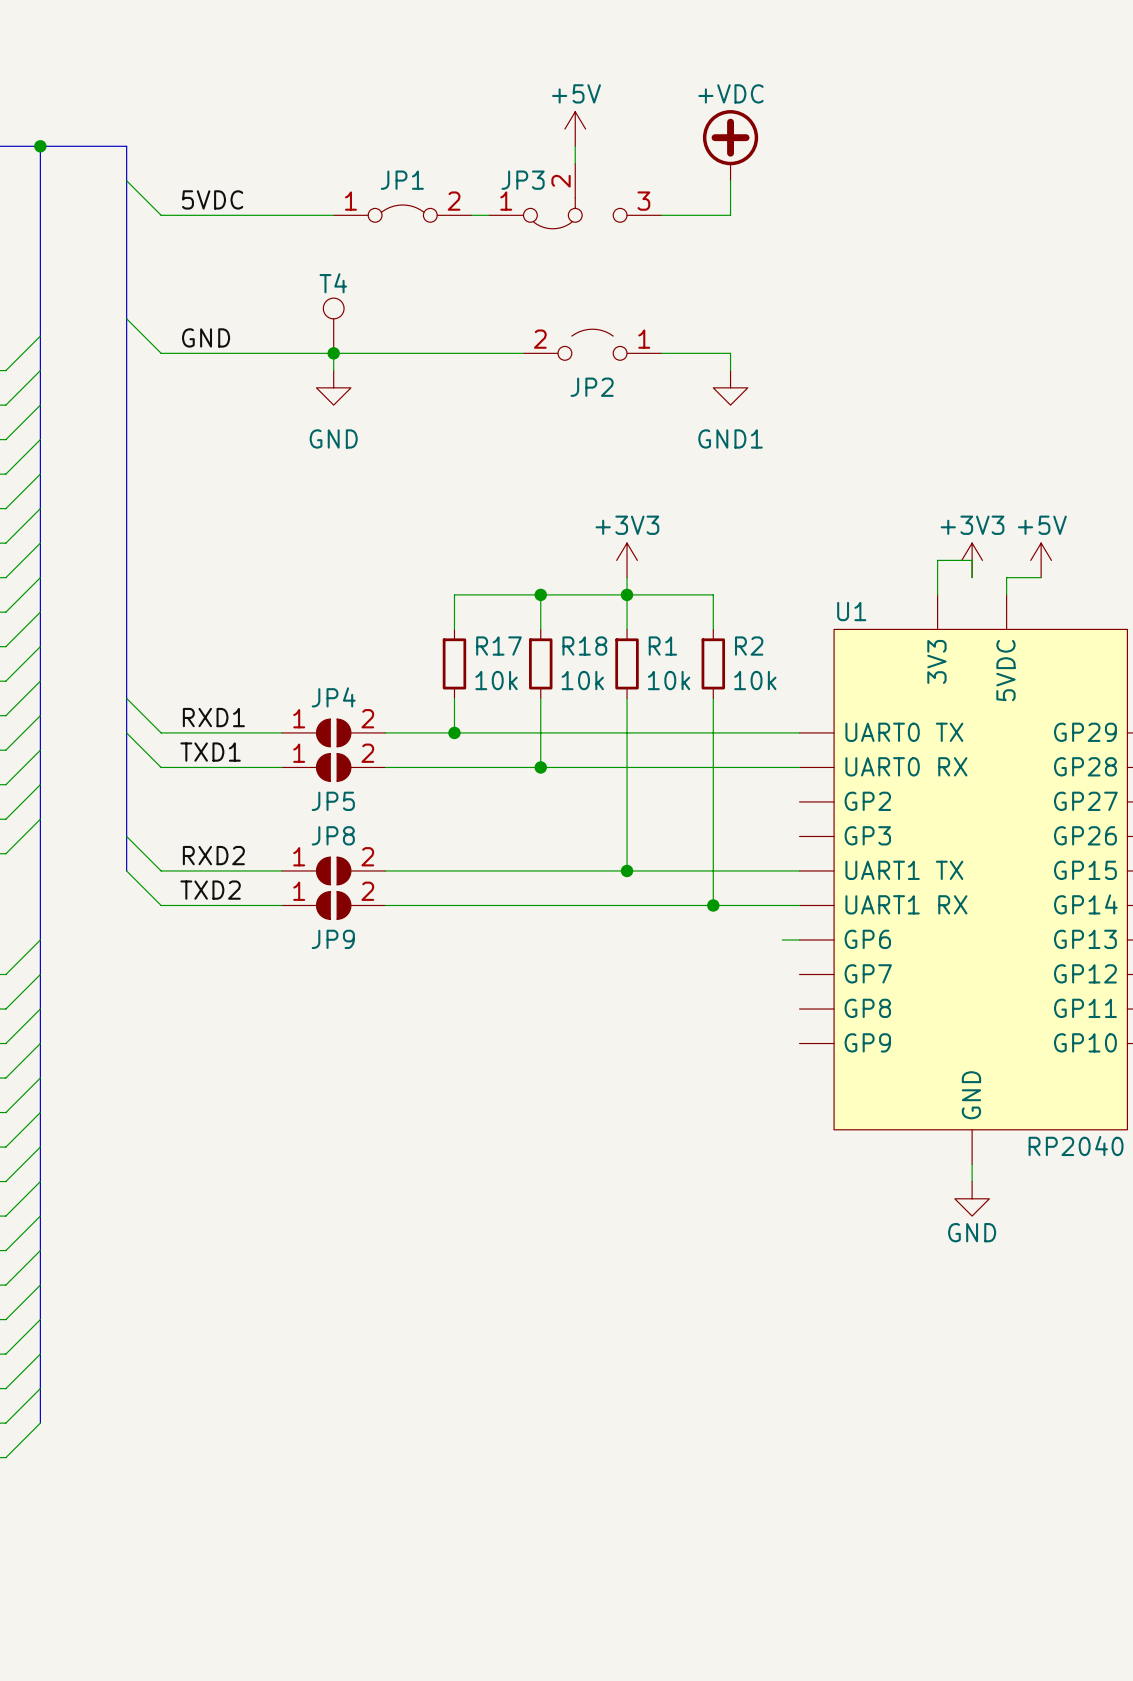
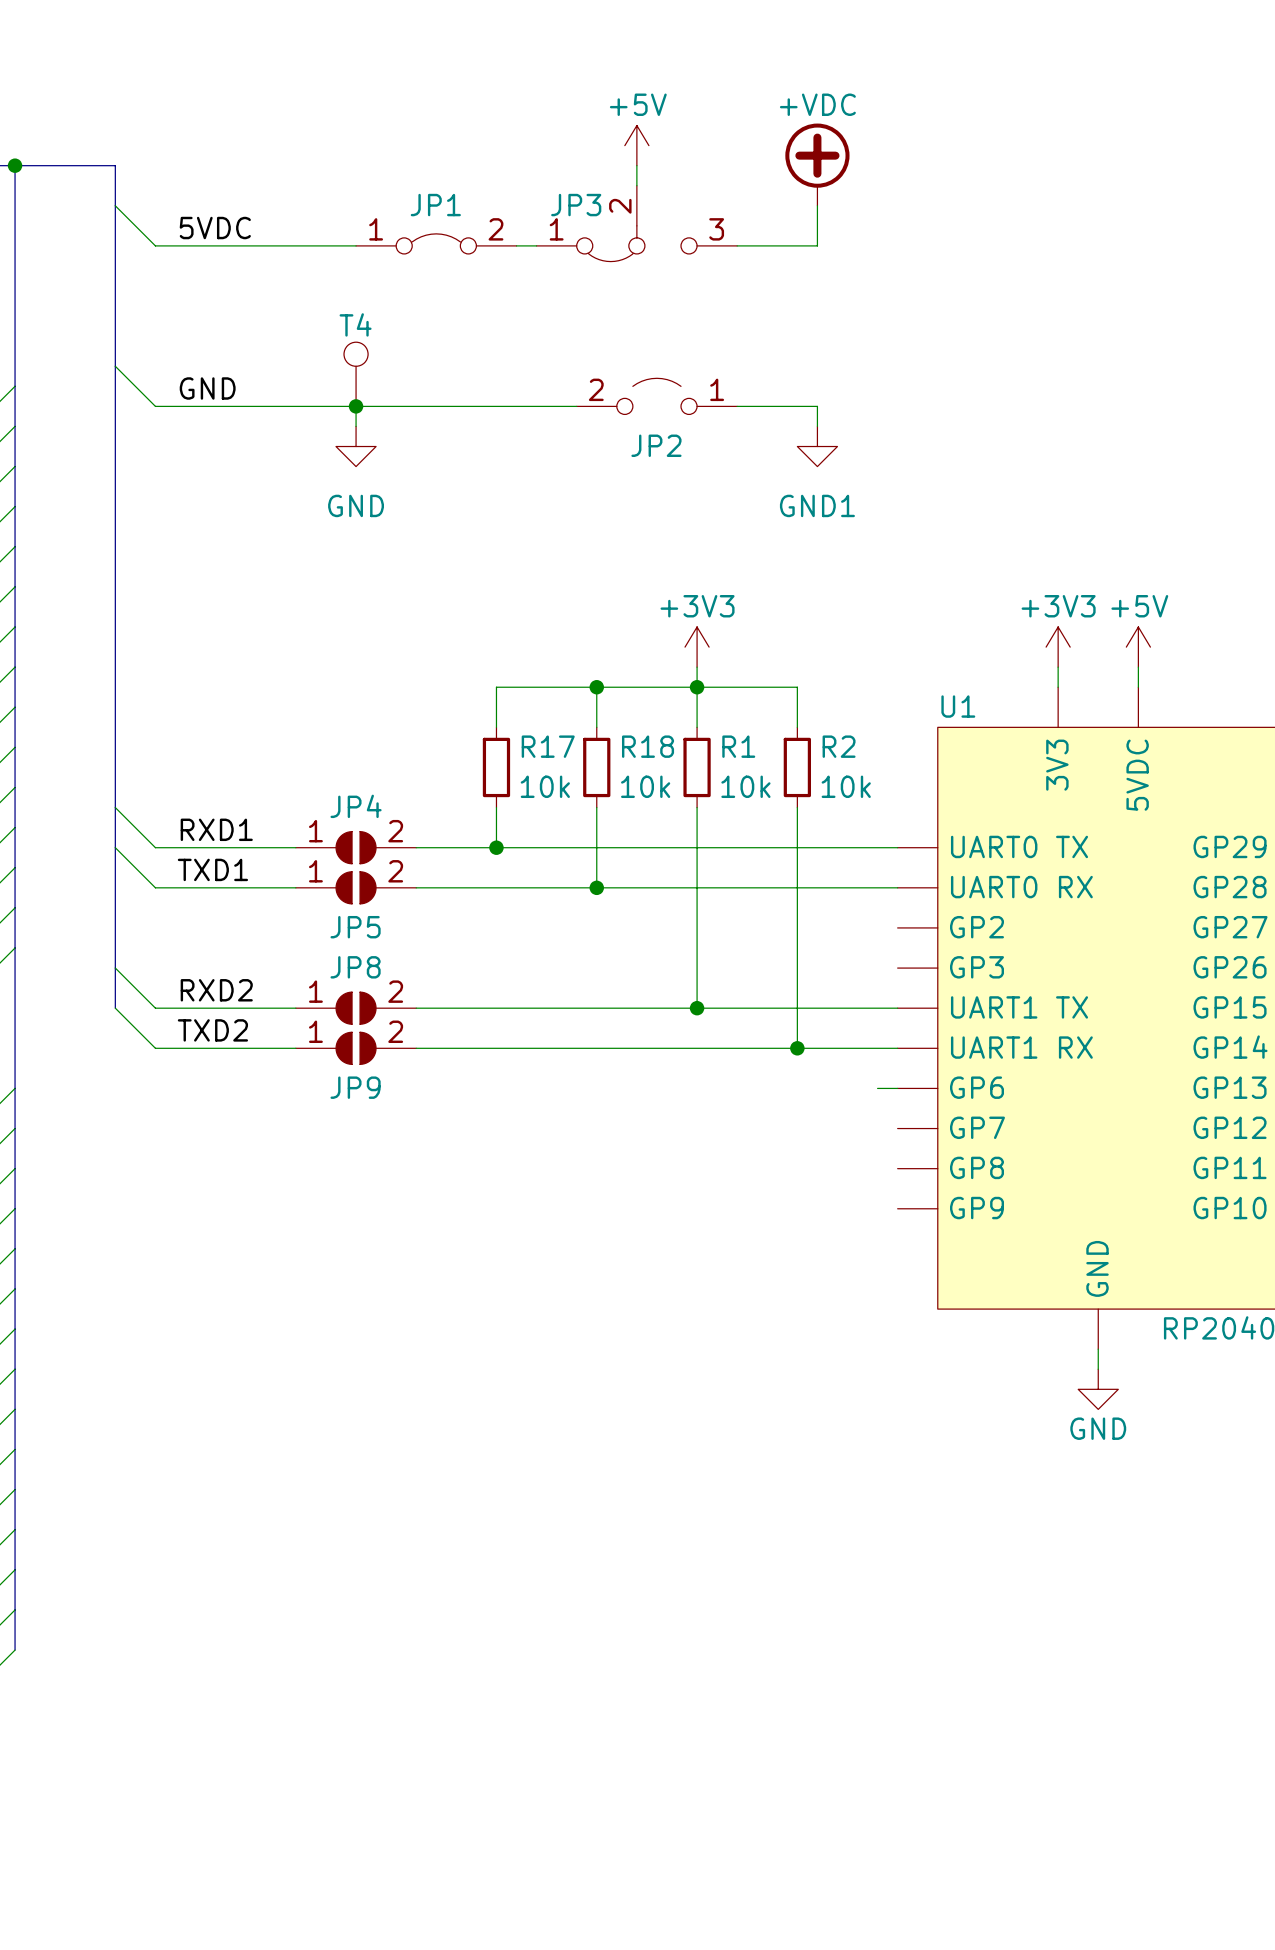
power symbol position: +3V3 (972, 560) -> +3V3 (1058, 647)
power symbol position: +5V (1041, 560) -> +5V (1138, 647)
wire: (937, 577) (937, 560) (972, 560) (972, 577) -> none
wire: (1006, 577) (1041, 577) -> none

